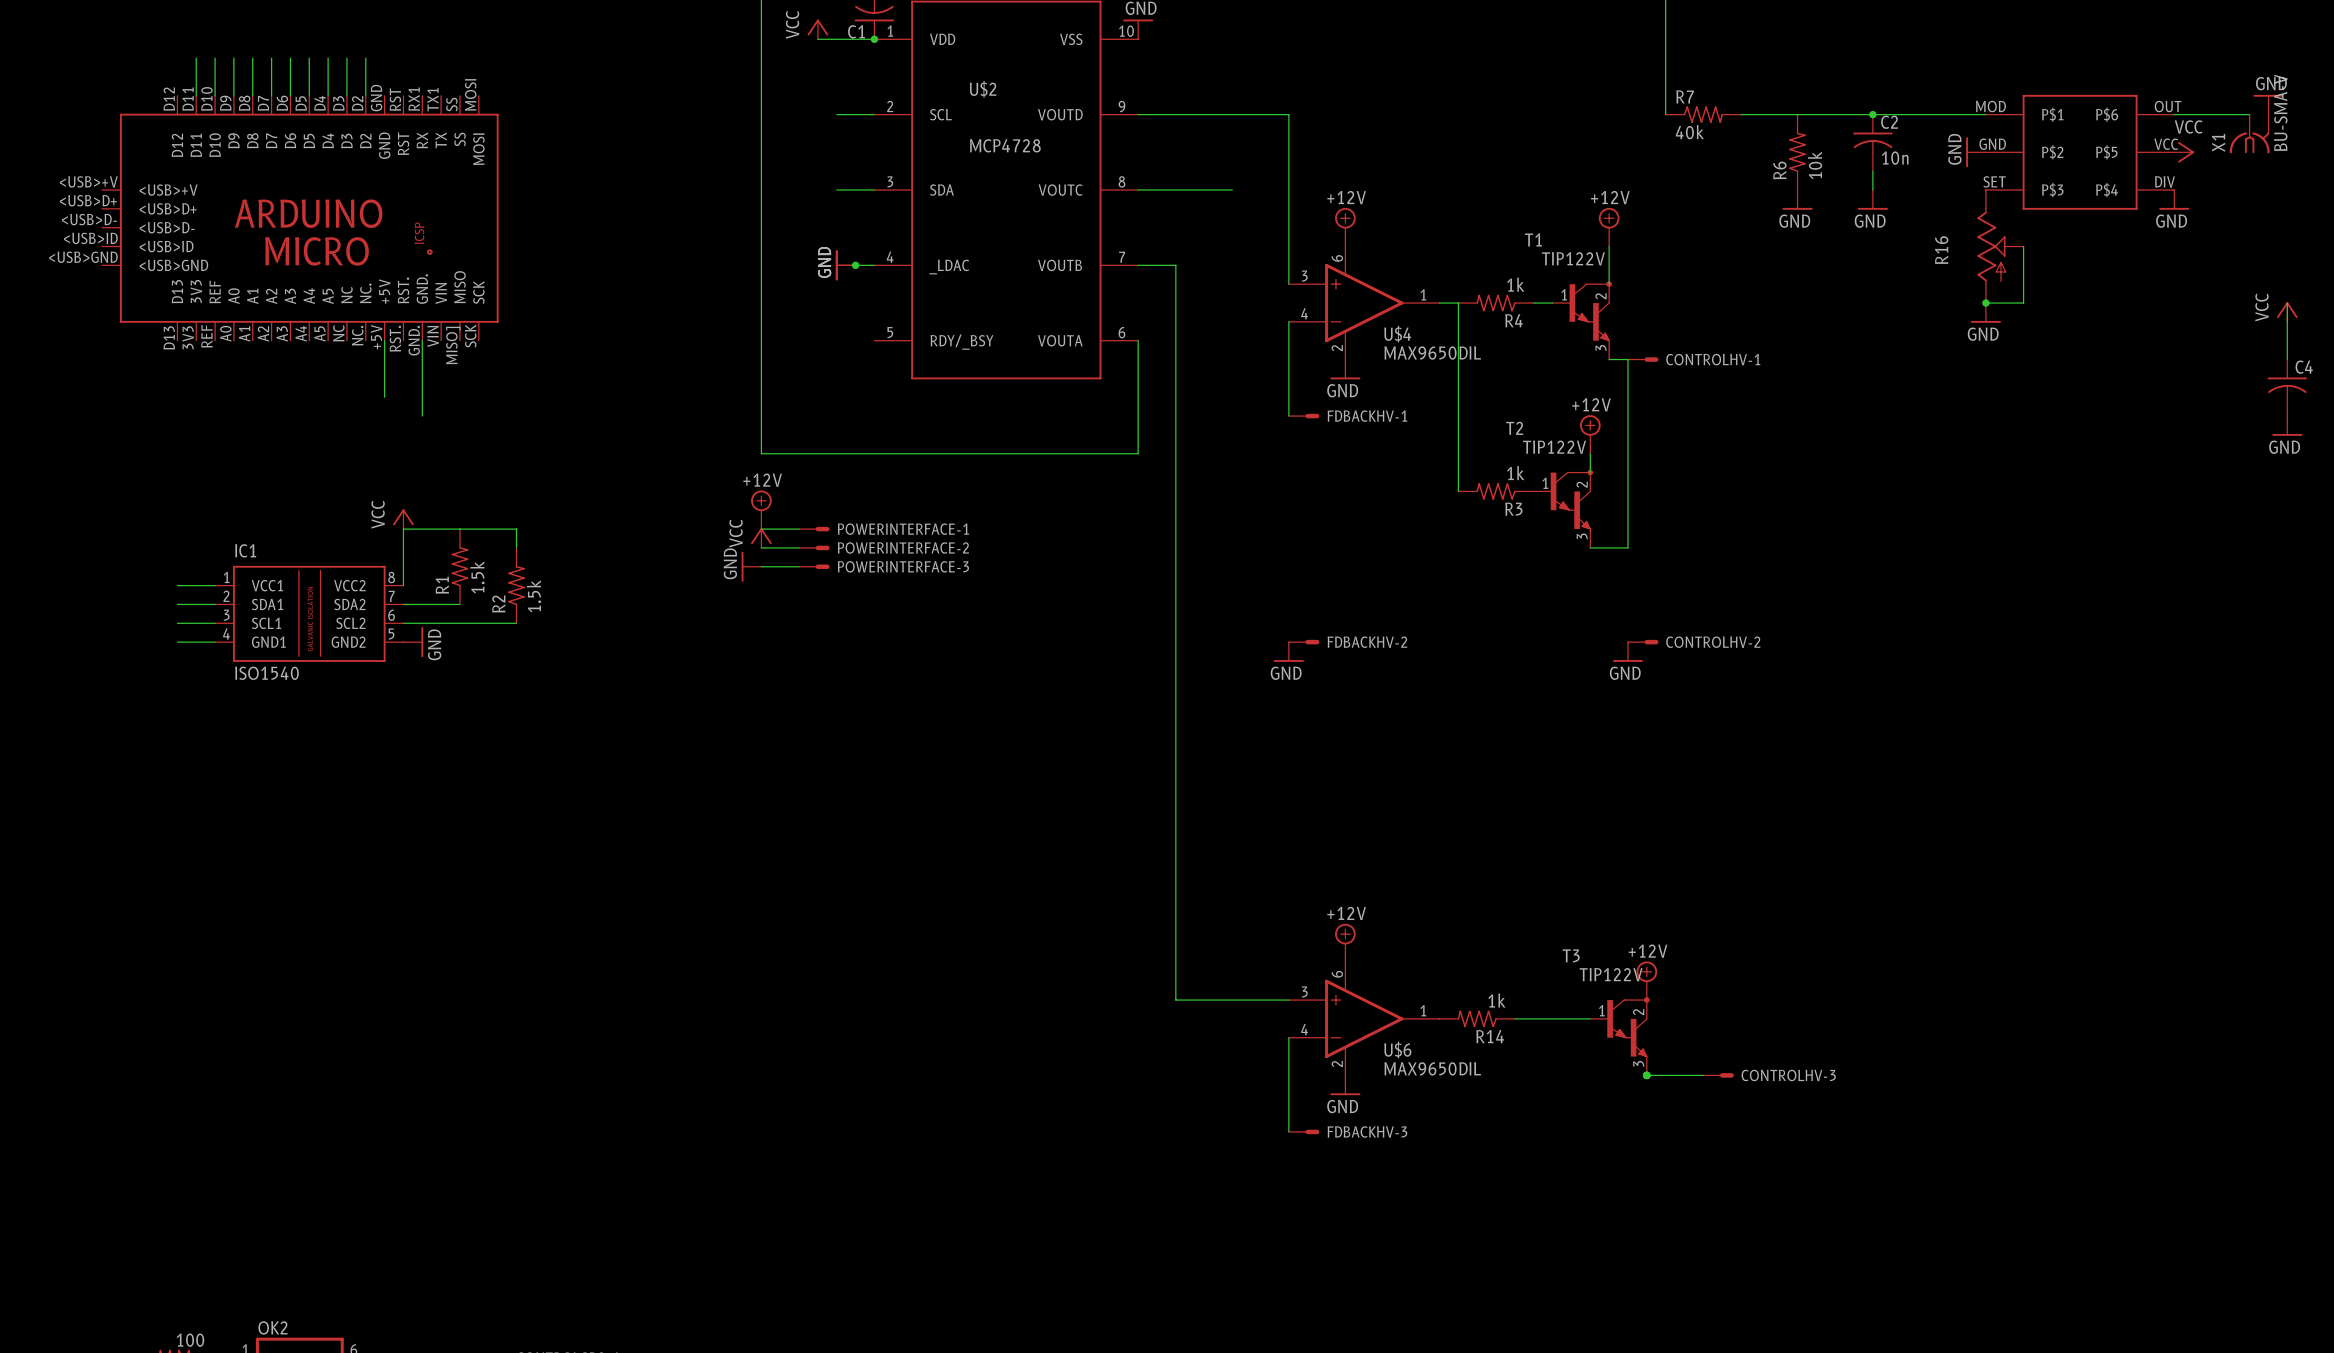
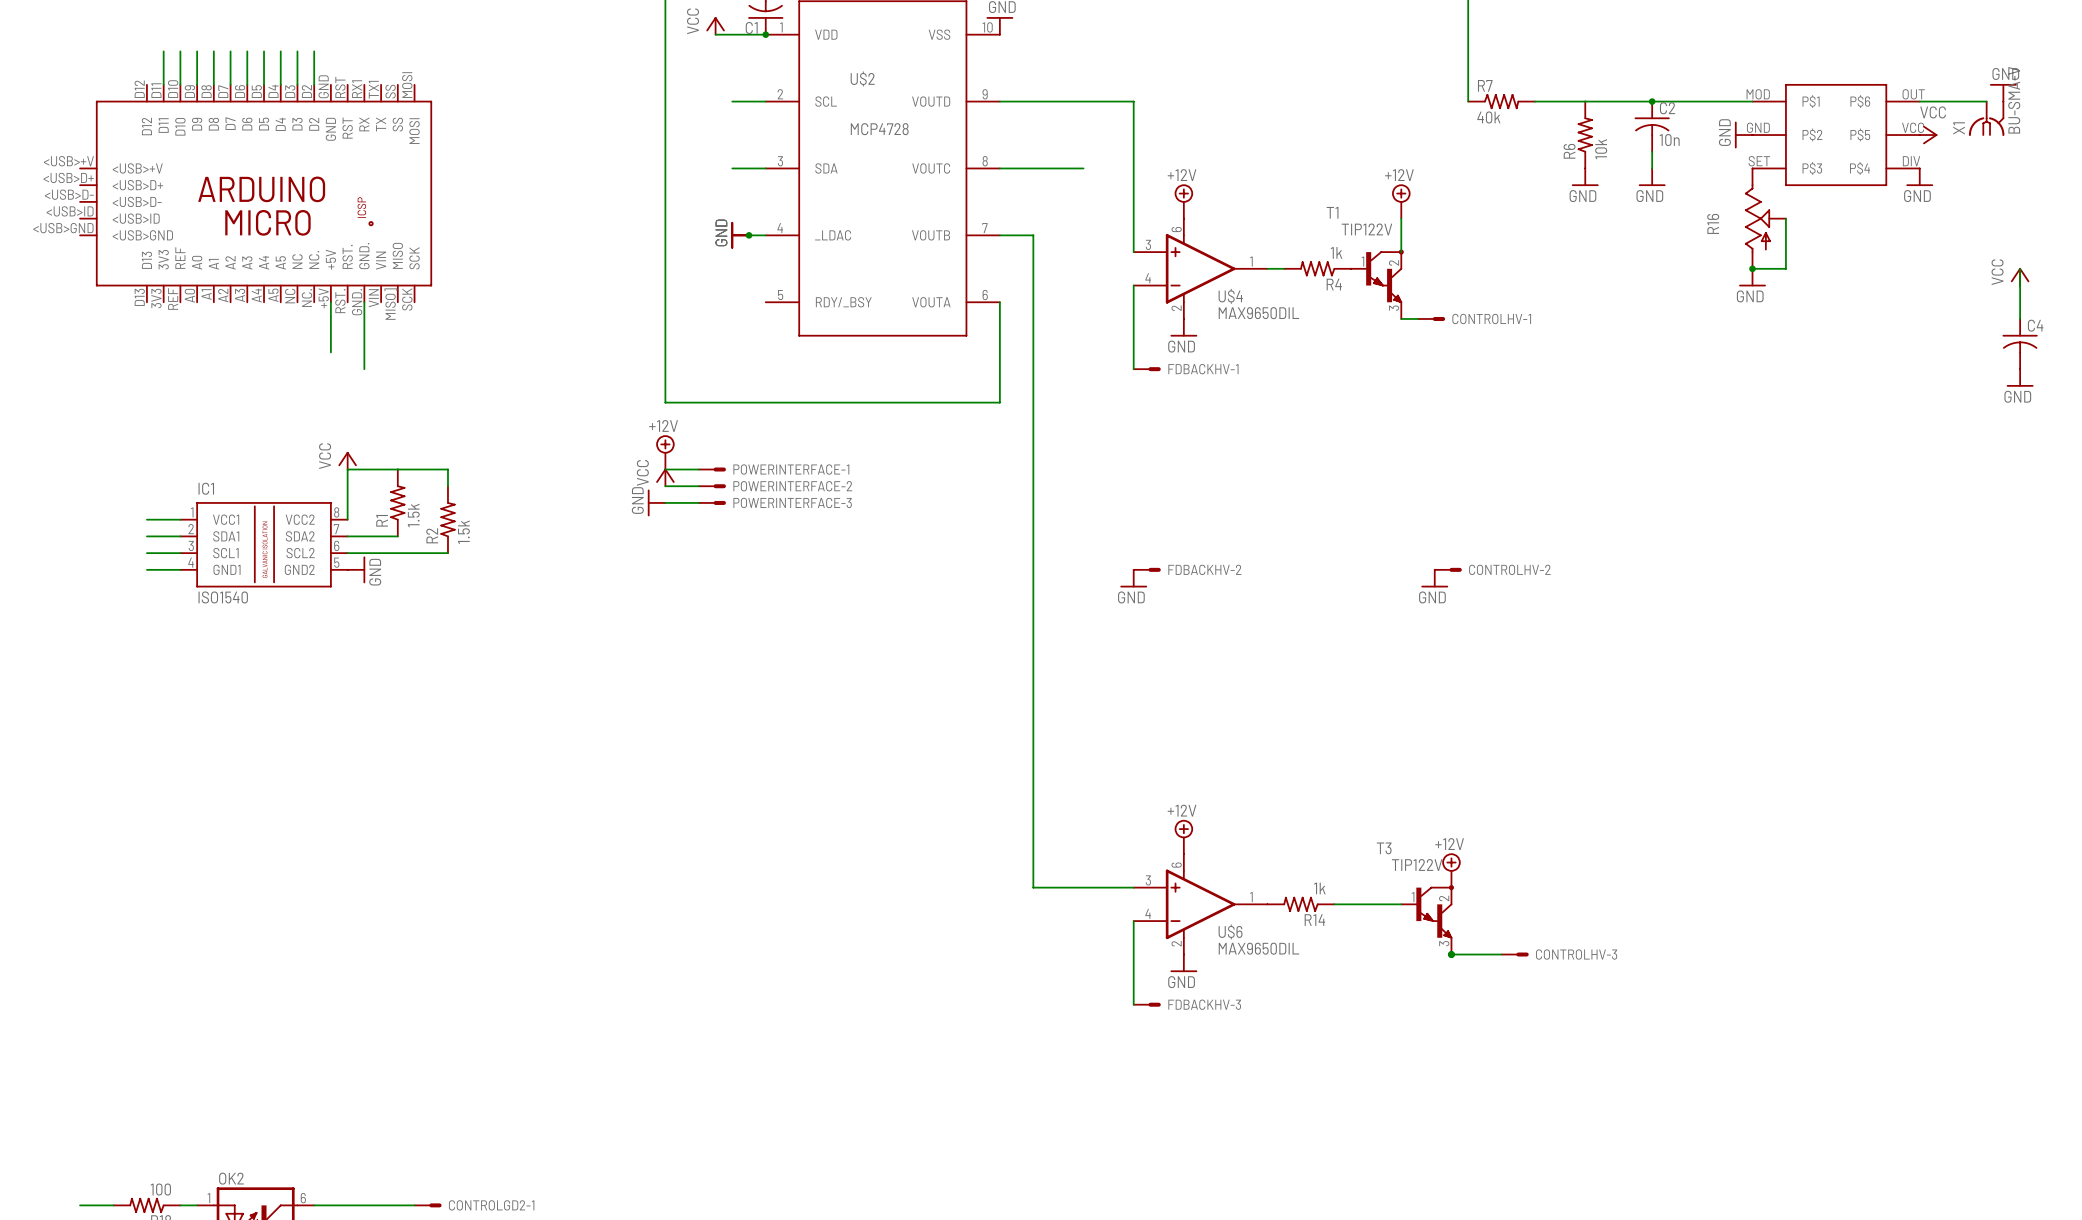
power symbol position: +12V (1609, 227) -> +12V (1401, 201)
wire: (1609, 246) (1609, 284) -> (1401, 218) (1401, 252)
wire: (1458, 303) (1458, 491) -> none
T1 position: (1582, 320) -> (1377, 284)
wire: (1609, 359) (1627, 359) (1627, 547) (1590, 547) -> (1418, 318) (1401, 318)
CONTROLHV-1 position: (1643, 359) -> (1431, 318)
power symbol: +12V (1590, 434) -> none
wire: (1590, 453) (1590, 472) -> none
R3: 1k (1496, 491) -> none
T2: TIP122V (1563, 508) -> none

